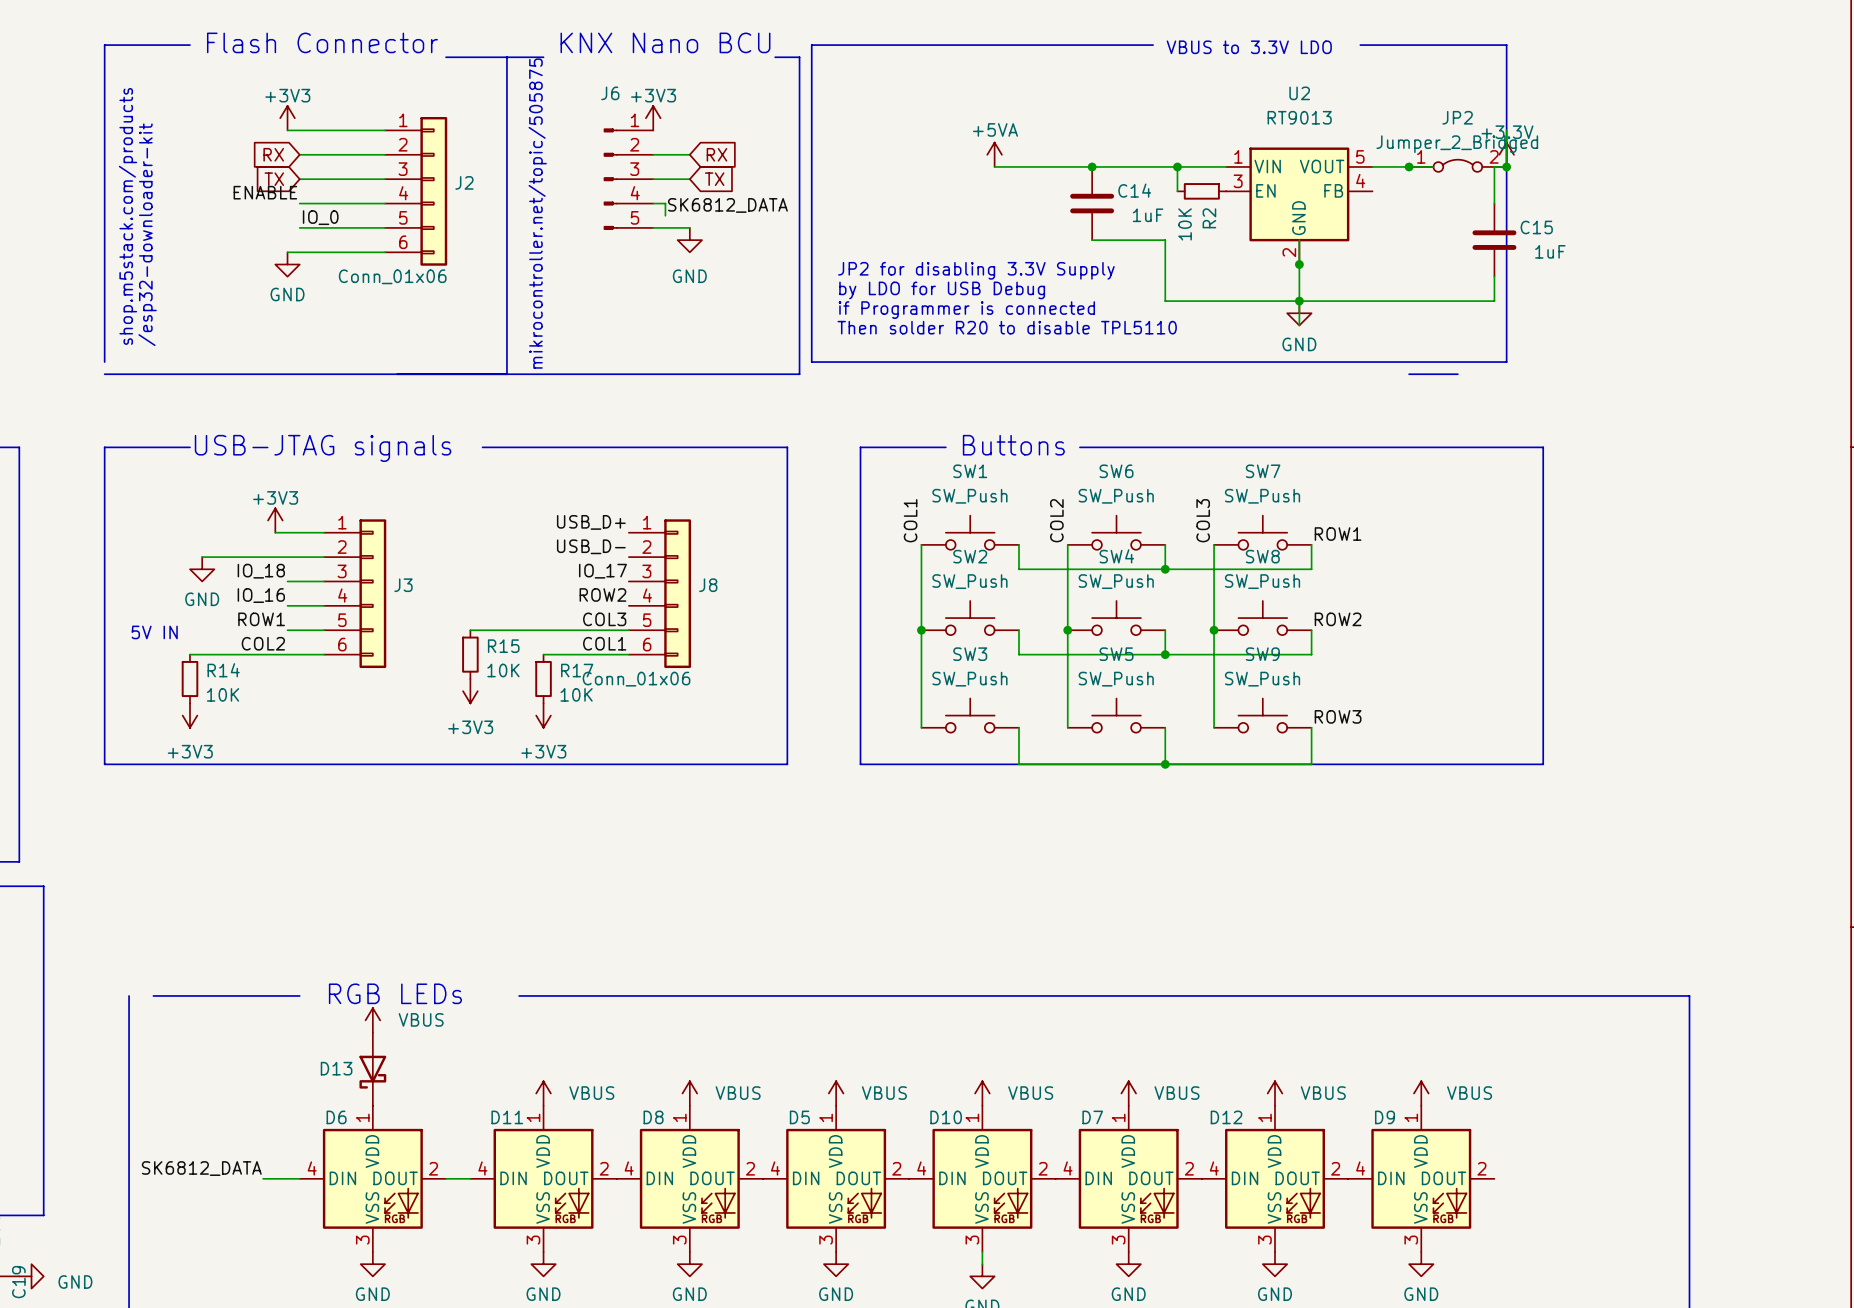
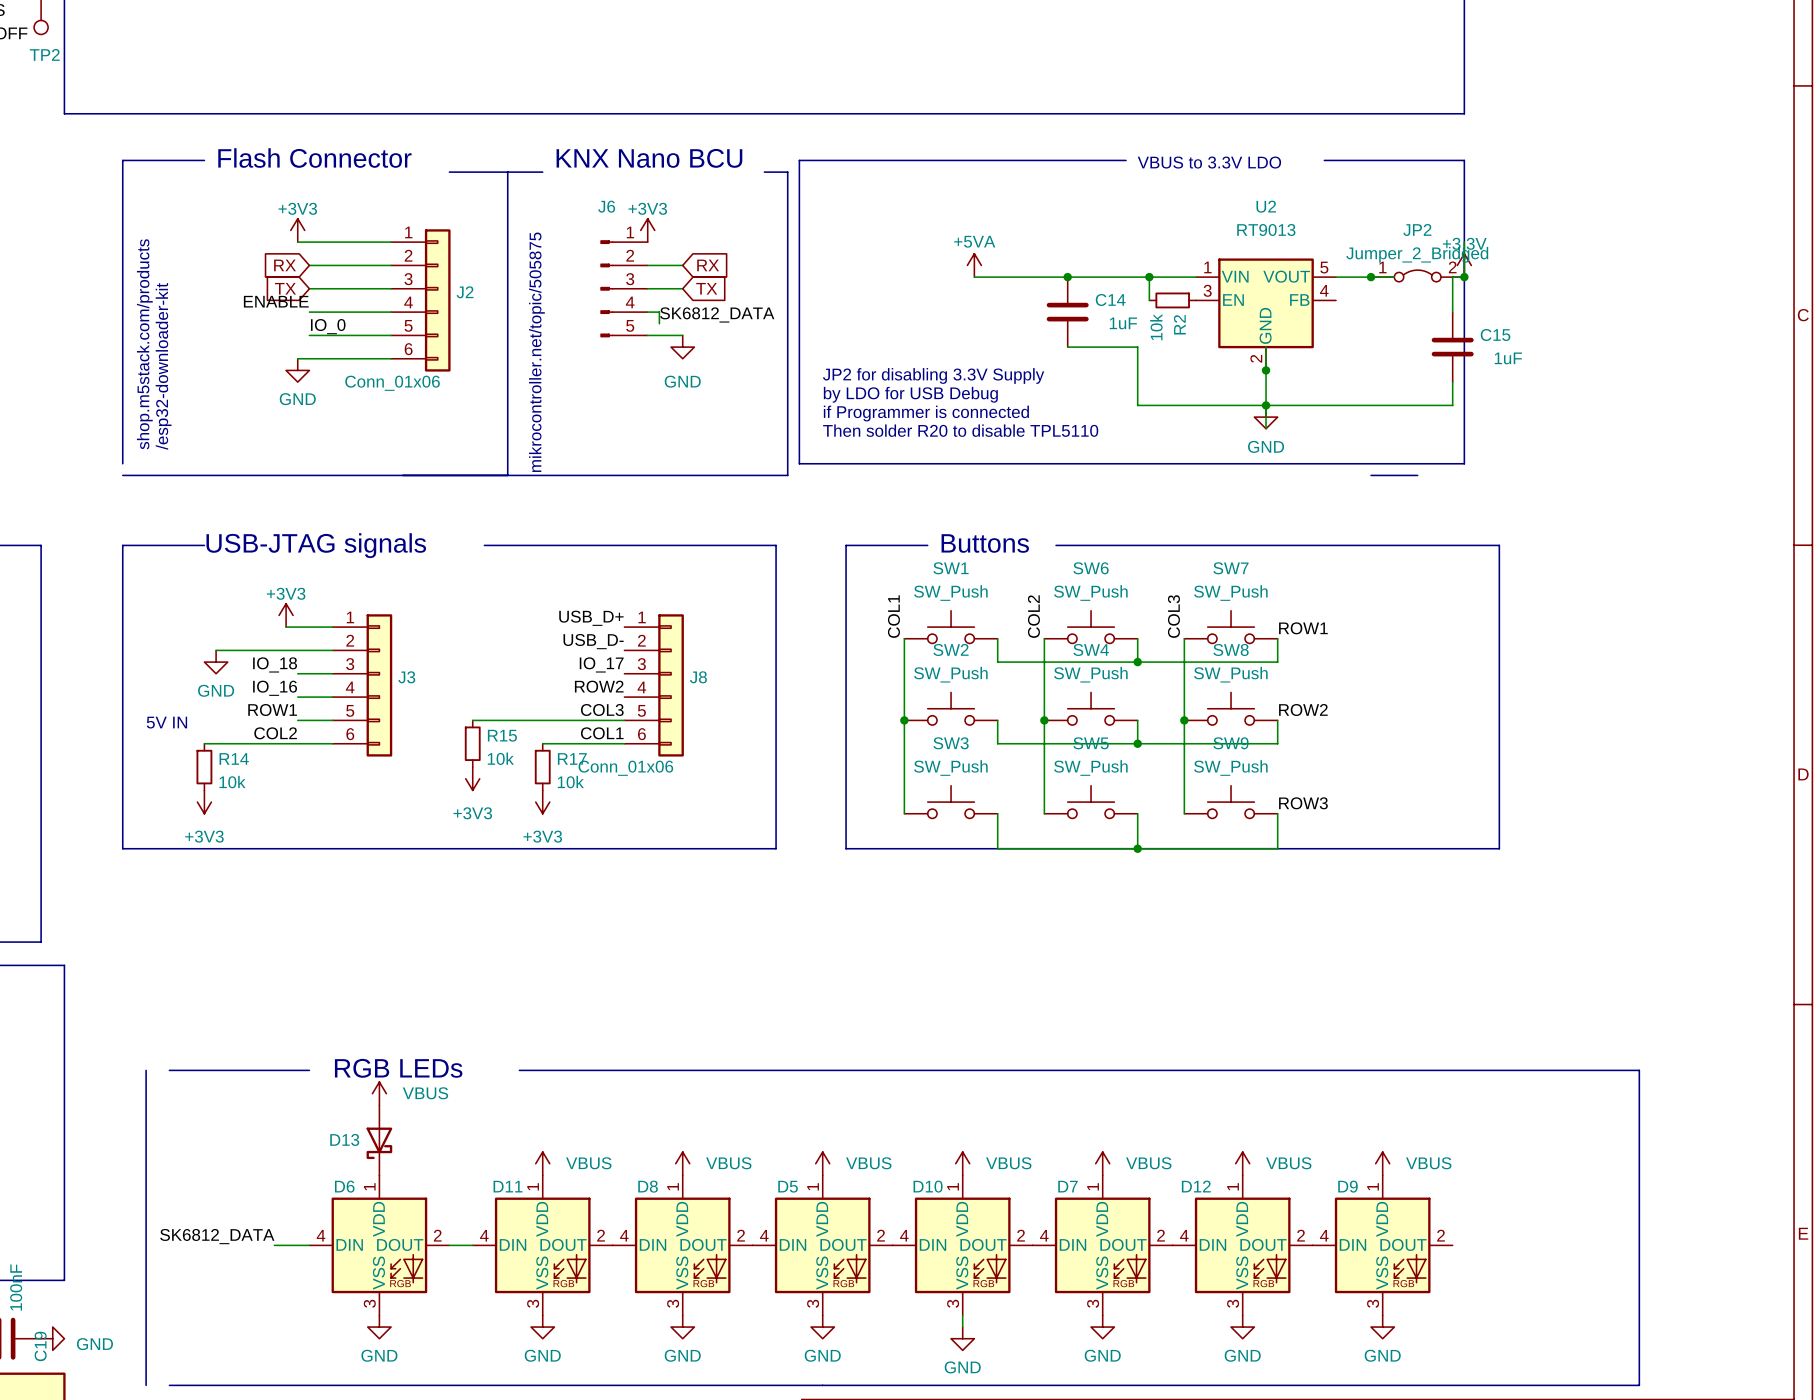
R2 value: 10K (1185, 224) -> 10k (1156, 327)
R15 value: 10K (503, 670) -> 10k (500, 758)
R14 value: 10K (223, 694) -> 10k (232, 782)
R17 value: 10K (576, 694) -> 10k (570, 782)

